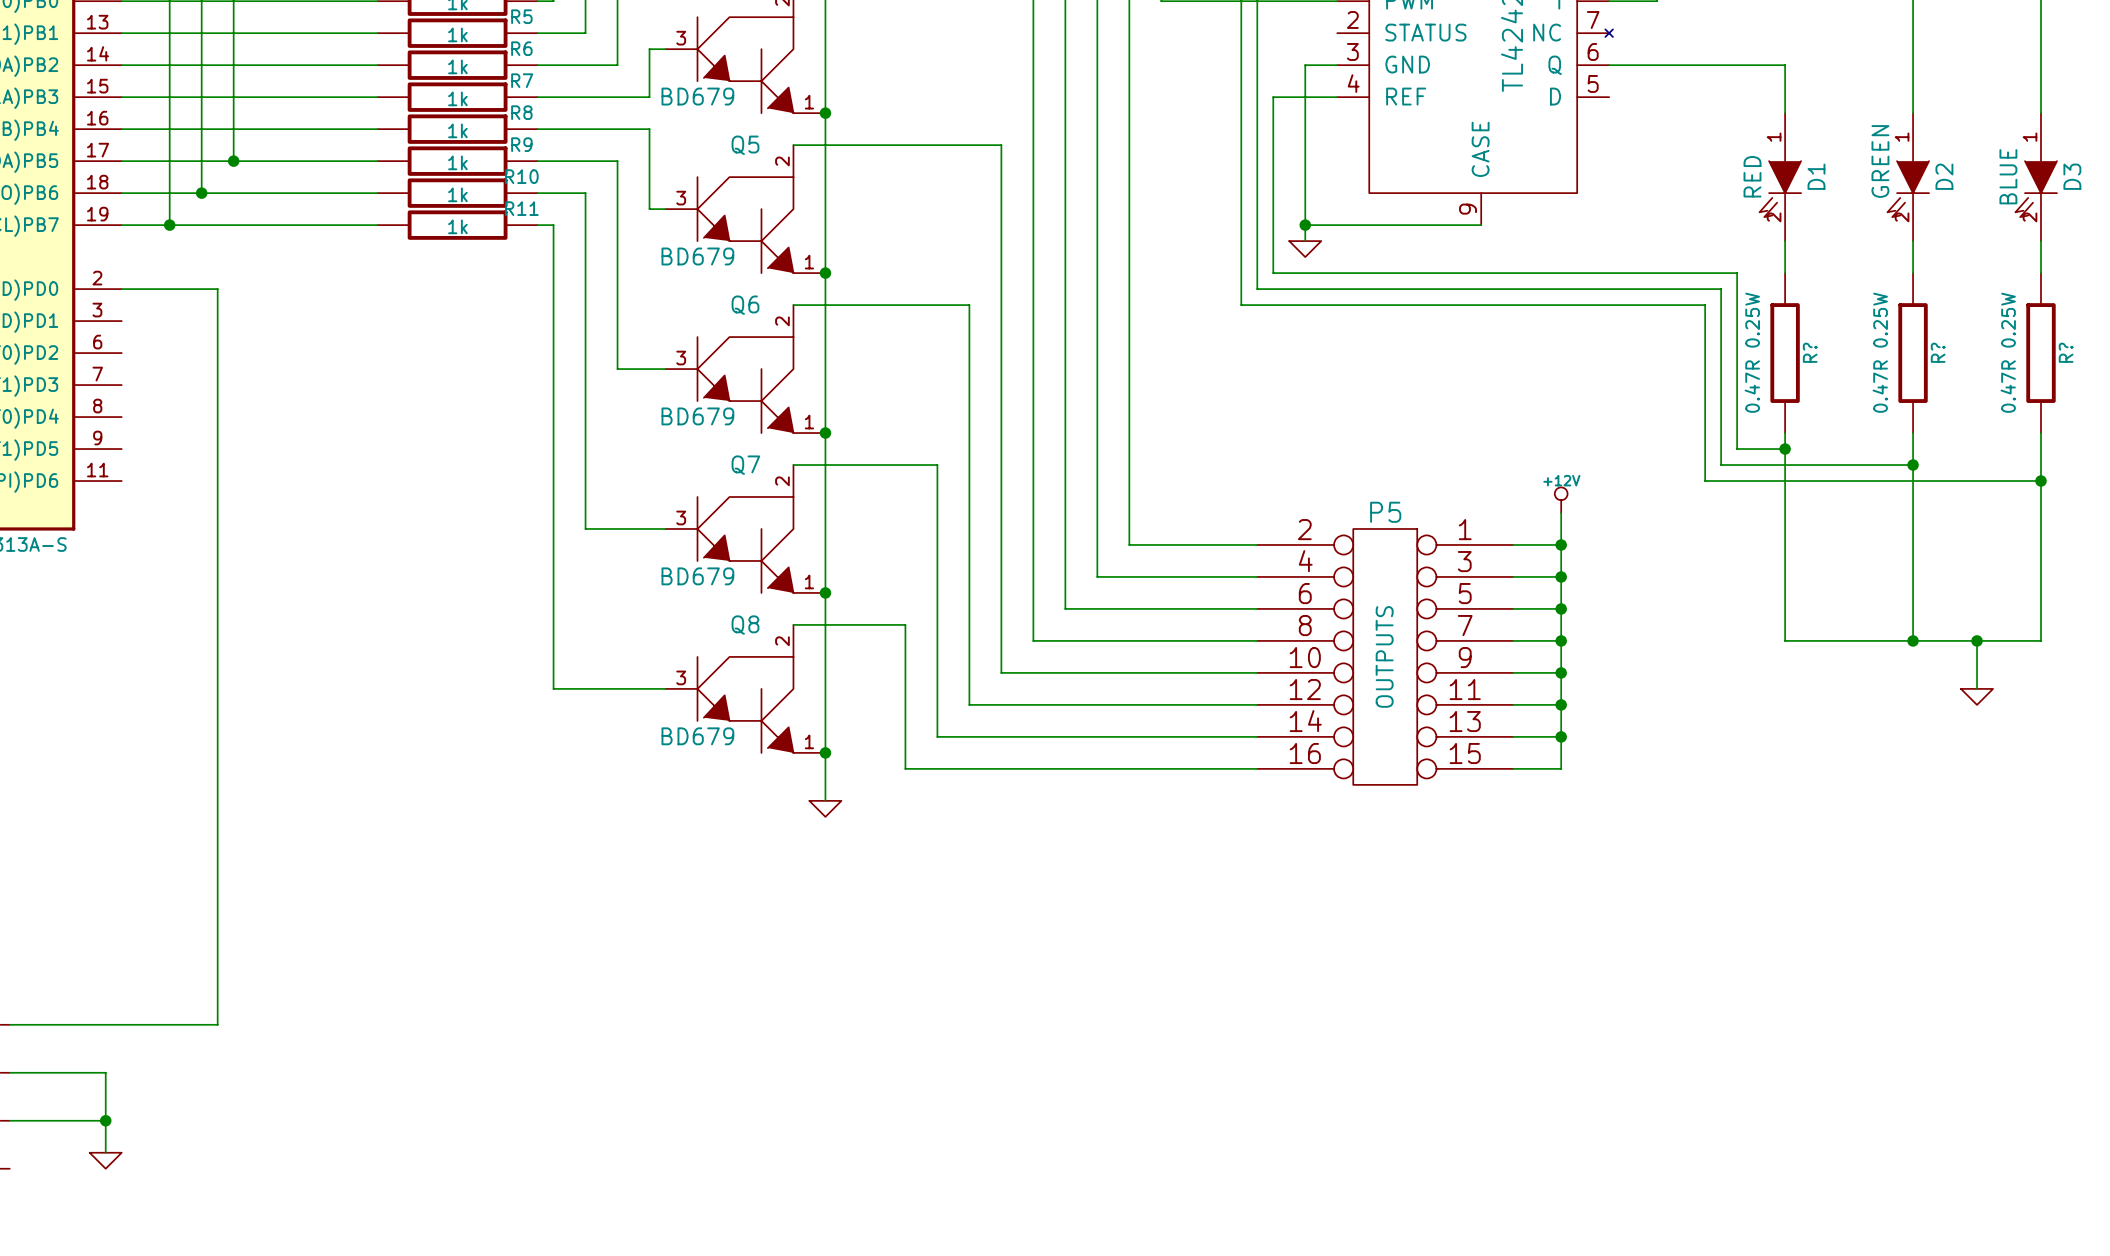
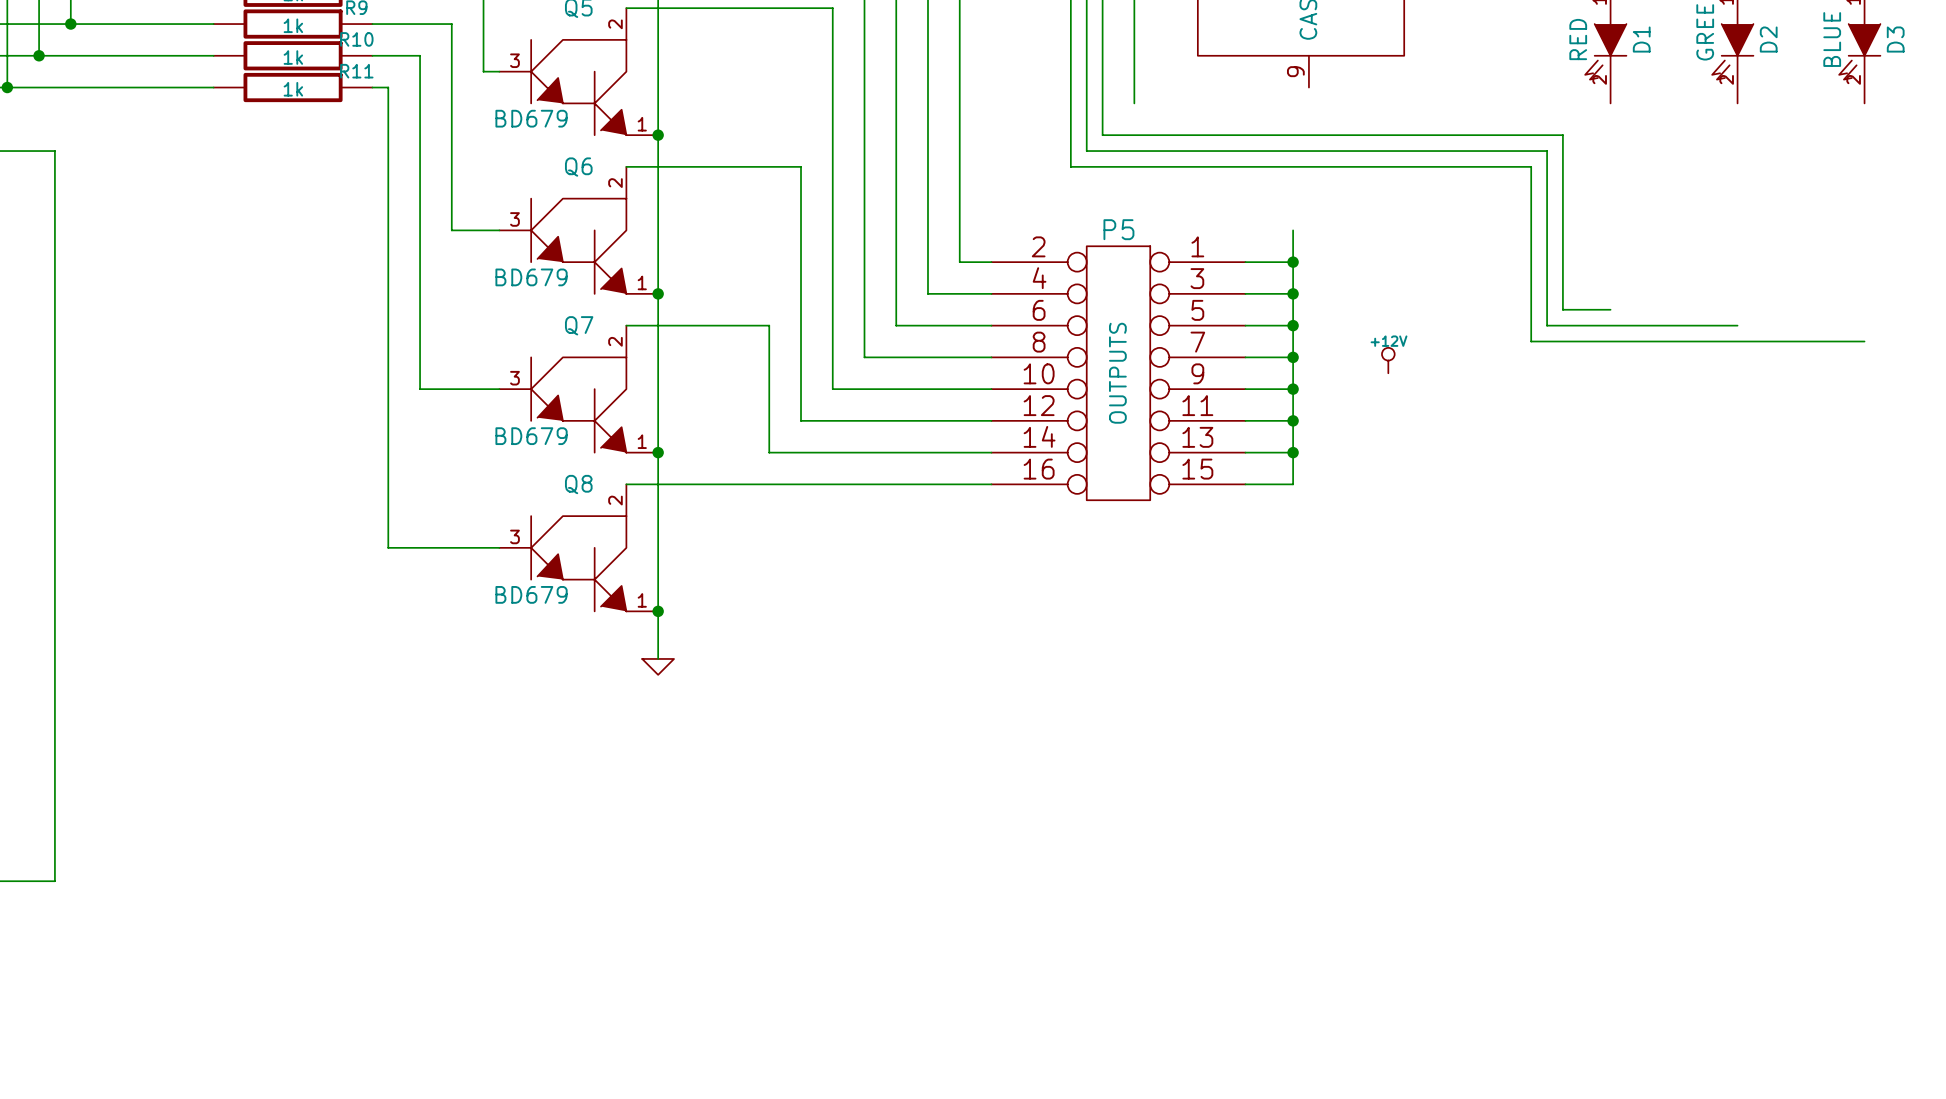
wire: (1305, 225) (1481, 225) -> none
junction: (1305, 225) -> none
wire: (1785, 241) (1785, 273) -> none
wire: (1913, 241) (1913, 273) -> none
wire: (2040, 241) (2040, 273) -> none
power symbol: (1305, 249) -> none
R?: 0.47R 0.25W (1785, 353) -> none
R?: 0.47R 0.25W (1913, 353) -> none
R?: 0.47R 0.25W (2040, 353) -> none
wire: (1129, 401) (1129, 544) (1257, 544) -> (959, 262) (991, 262)
junction: none -> (1293, 262)
wire: (1097, 433) (1097, 576) (1257, 576) -> (927, 293) (991, 293)
junction: none -> (1293, 293)
wire: (1785, 433) (1785, 640) (2040, 640) (2040, 433) -> none
wire: (1913, 433) (1913, 640) -> none
junction: (1785, 449) -> none
wire: (1065, 465) (1065, 608) (1257, 608) -> (896, 325) (991, 325)
junction: none -> (1293, 325)
junction: (1913, 465) -> none
junction: (2040, 481) -> none
wire: (1033, 497) (1033, 640) (1257, 640) -> (864, 357) (991, 357)
junction: none -> (1293, 357)
wire: (1561, 512) (1561, 768) (1513, 768) -> (1293, 230) (1293, 484) (1245, 484)
wire: (1001, 528) (1001, 672) (1257, 672) -> (832, 389) (991, 389)
junction: none -> (1293, 389)
wire: (1513, 544) (1561, 544) -> (1245, 262) (1293, 262)
junction: (1561, 544) -> none
wire: (969, 560) (969, 704) (1257, 704) -> (801, 420) (991, 420)
junction: none -> (1293, 420)
wire: (1513, 576) (1561, 576) -> (1245, 293) (1293, 293)
junction: (1561, 576) -> none
wire: (937, 592) (937, 736) (1257, 736) -> (769, 452) (991, 452)
junction: none -> (1293, 452)
wire: (1513, 608) (1561, 608) -> (1245, 325) (1293, 325)
junction: (1561, 608) -> none
wire: (905, 624) (905, 768) (1257, 768) -> (737, 484) (991, 484)
wire: (1513, 640) (1561, 640) -> (1245, 357) (1293, 357)
junction: (1561, 640) -> none
junction: (1913, 640) -> none
wire: (1977, 640) (1977, 688) -> none
junction: (1977, 640) -> none
P5 position: (1385, 656) -> (1118, 373)
wire: (1513, 672) (1561, 672) -> (1245, 389) (1293, 389)
junction: (1561, 672) -> none
power symbol: (1977, 696) -> none
wire: (1513, 704) (1561, 704) -> (1245, 420) (1293, 420)
junction: (1561, 704) -> none
wire: (1513, 736) (1561, 736) -> (1245, 452) (1293, 452)
junction: (1561, 736) -> none

